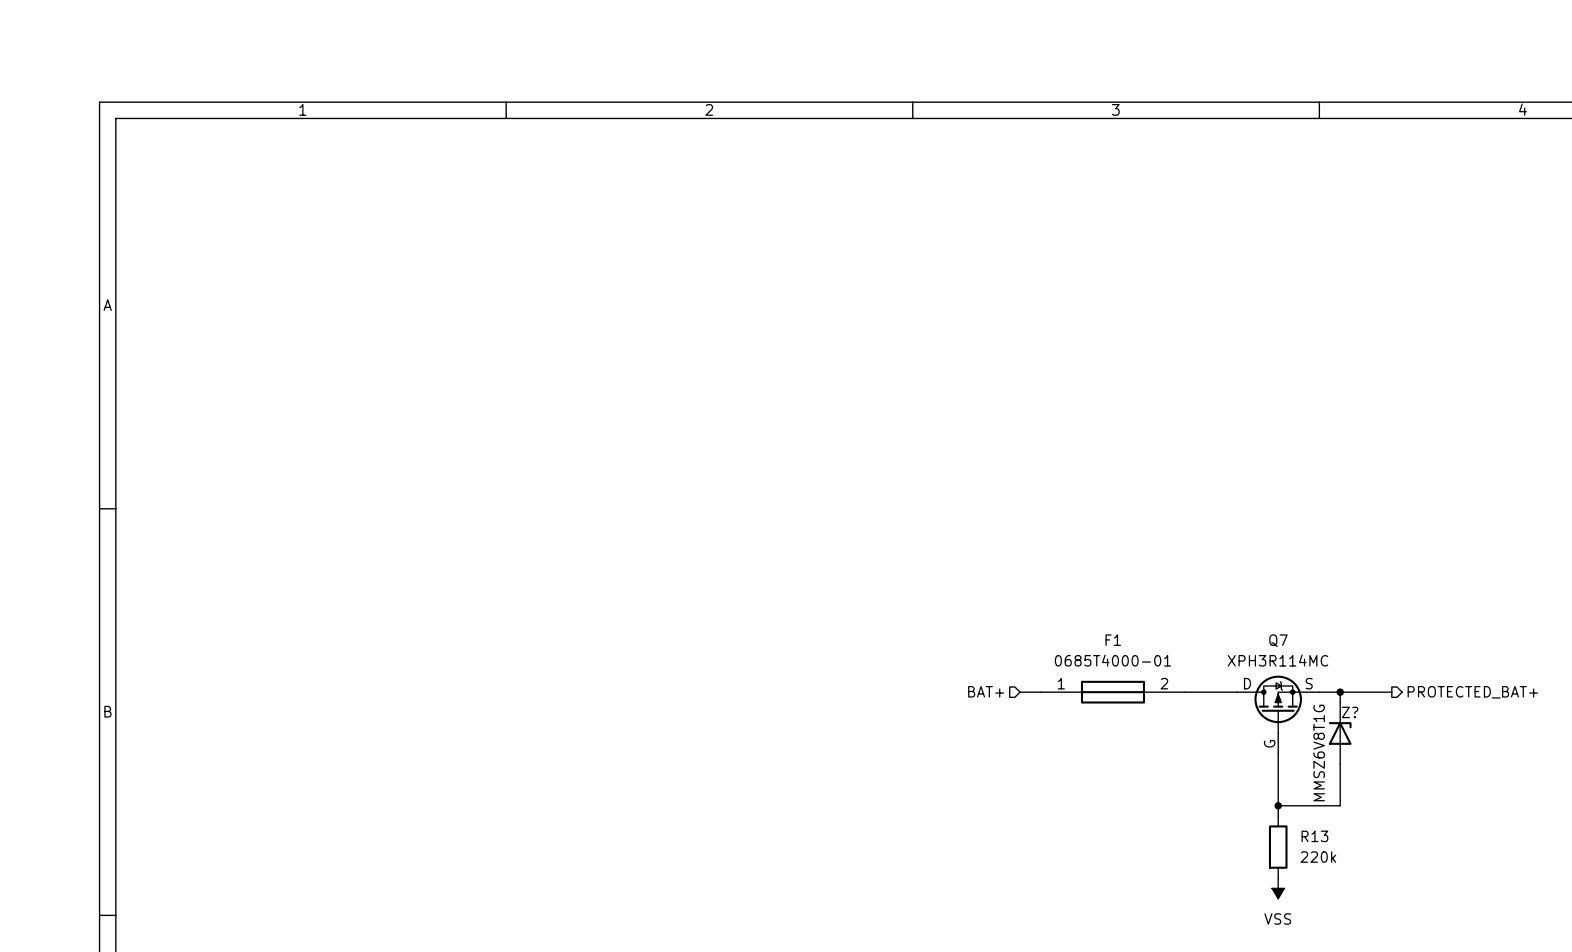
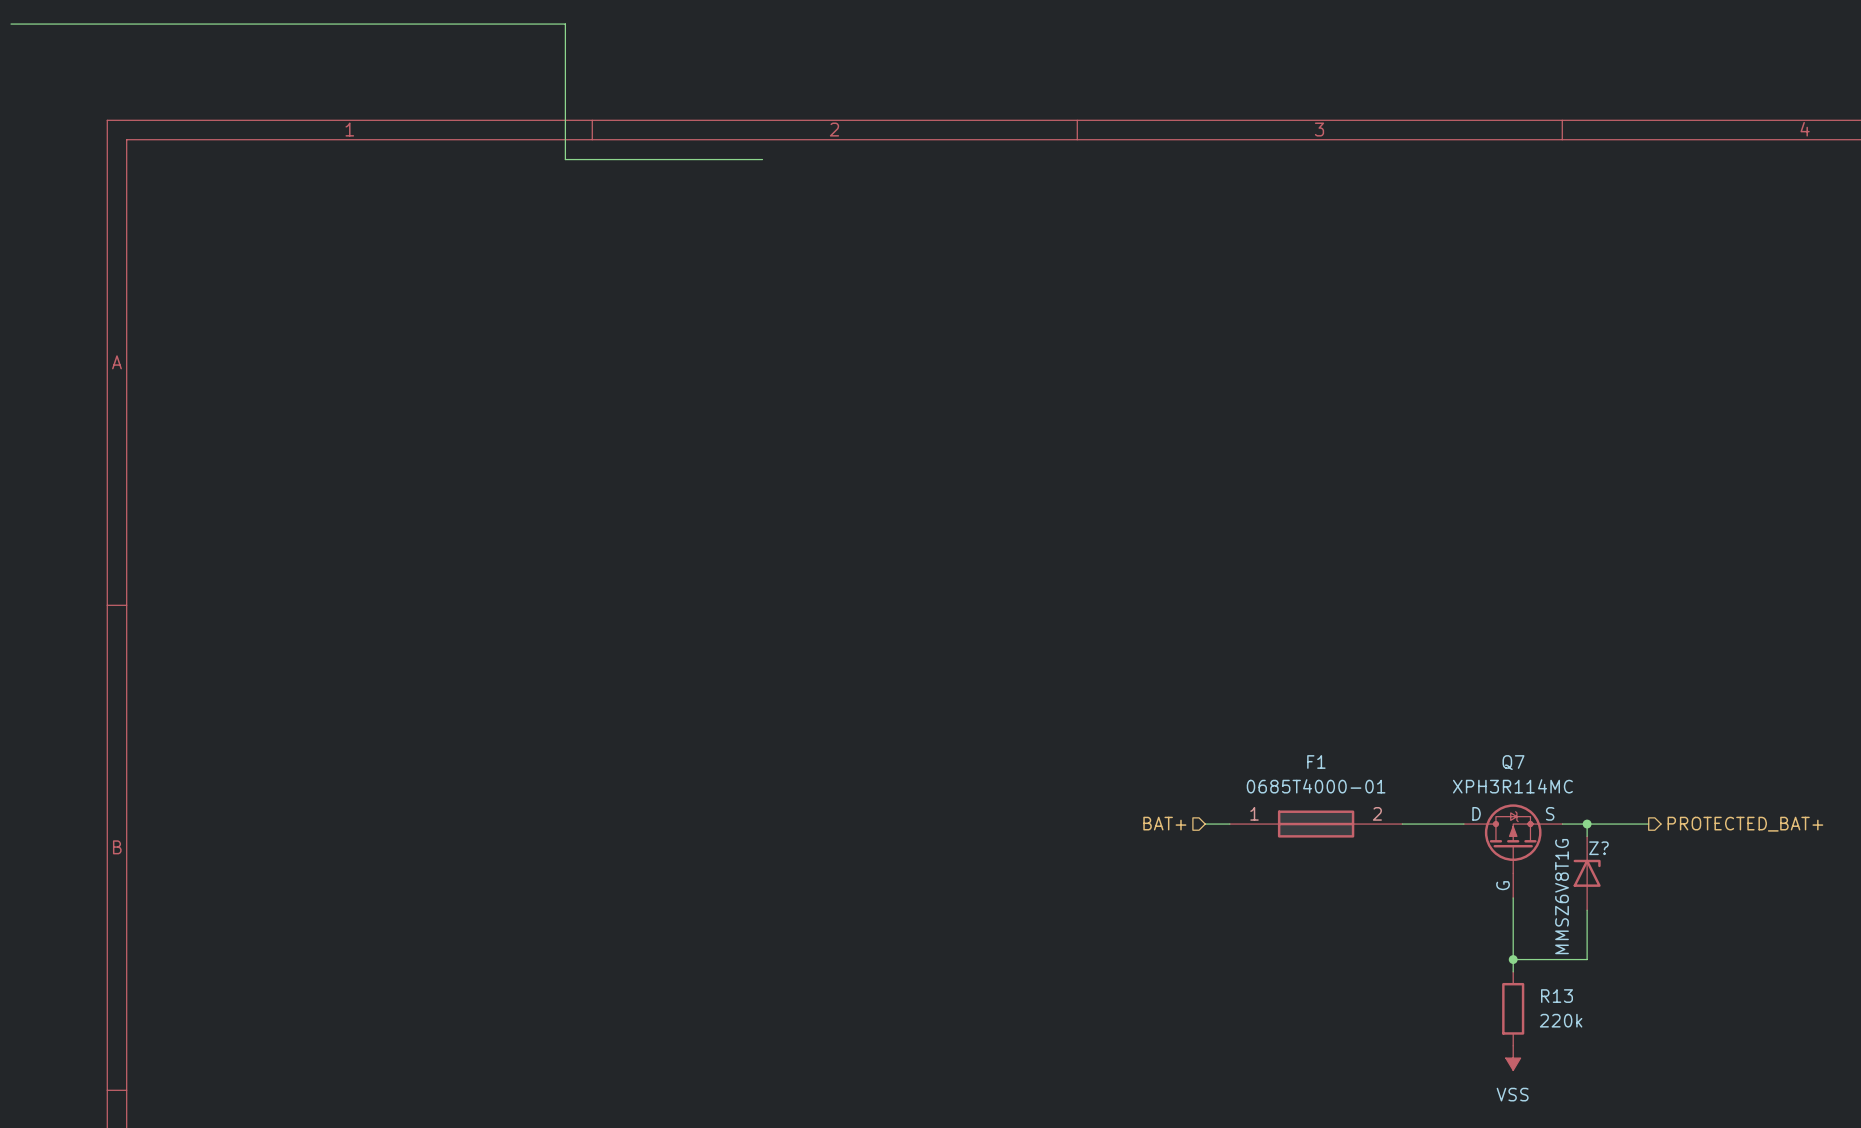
wire: none -> (11, 24) (565, 24) (565, 159) (762, 159)

